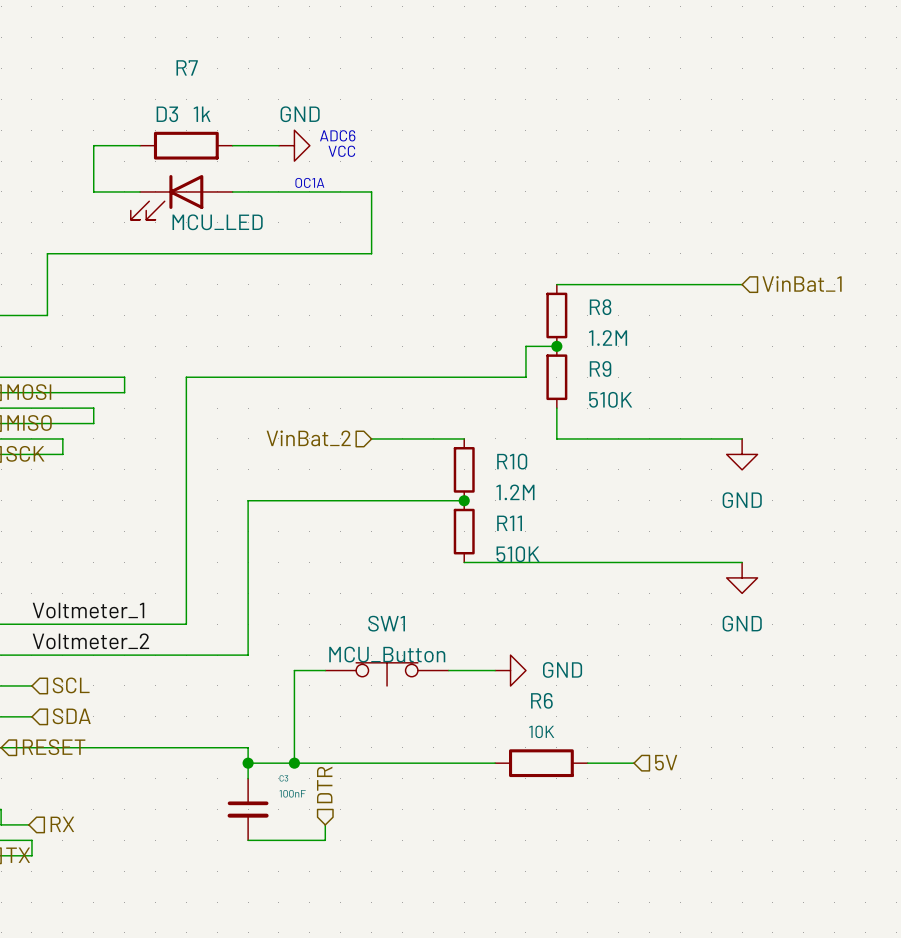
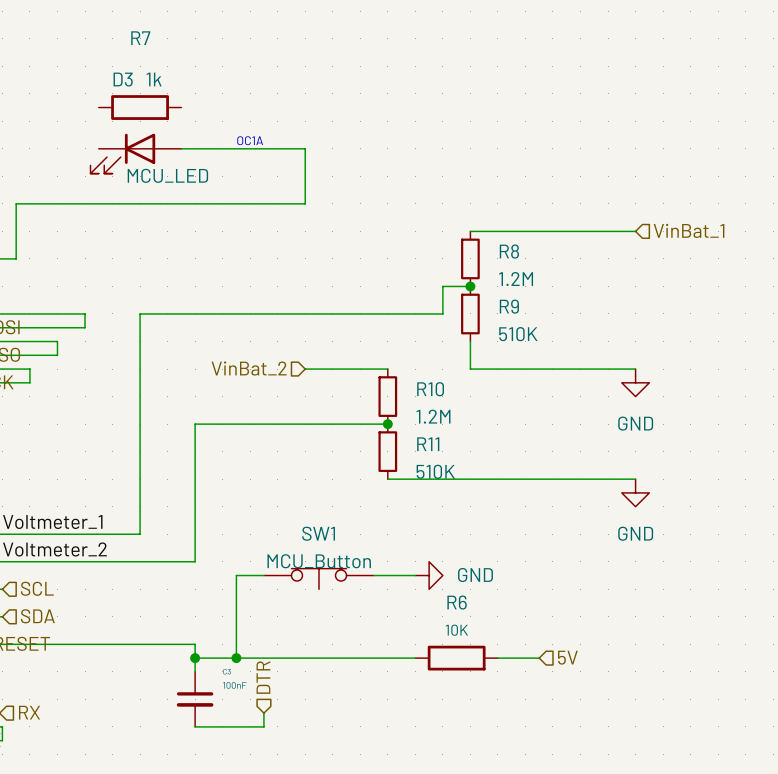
text: ADC6 (337, 135) -> none
wire: (140, 145) (93, 145) (93, 191) (140, 191) -> none
wire: (232, 145) (278, 145) -> none
power symbol: GND (294, 145) -> none
text: VCC (341, 151) -> none

